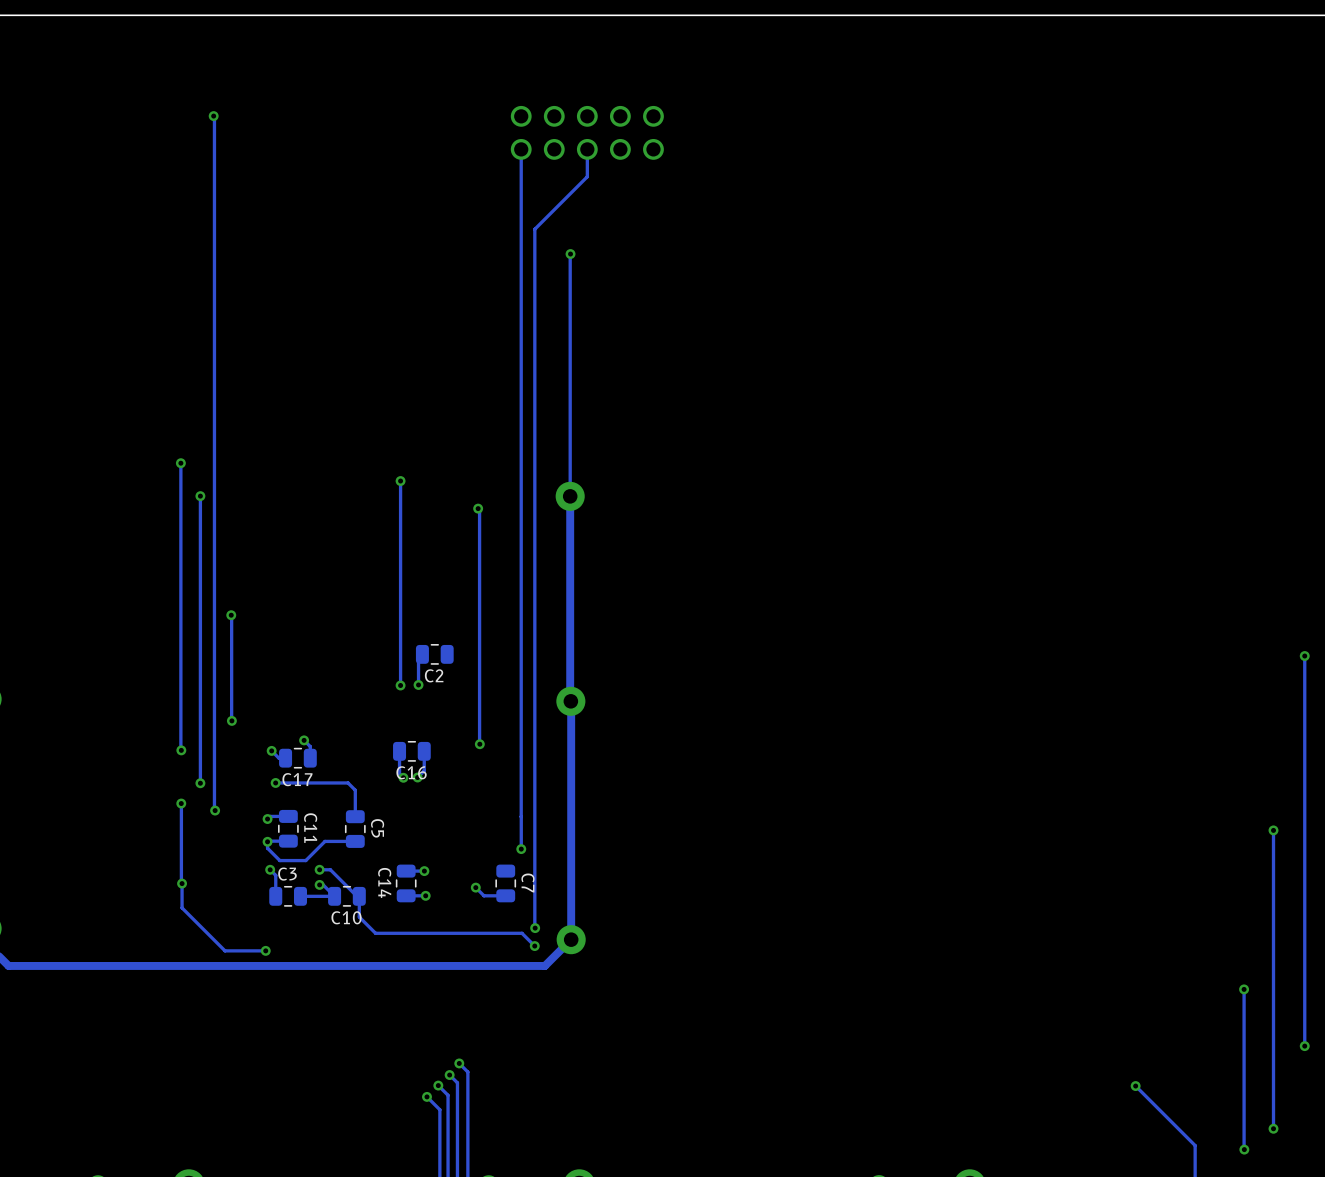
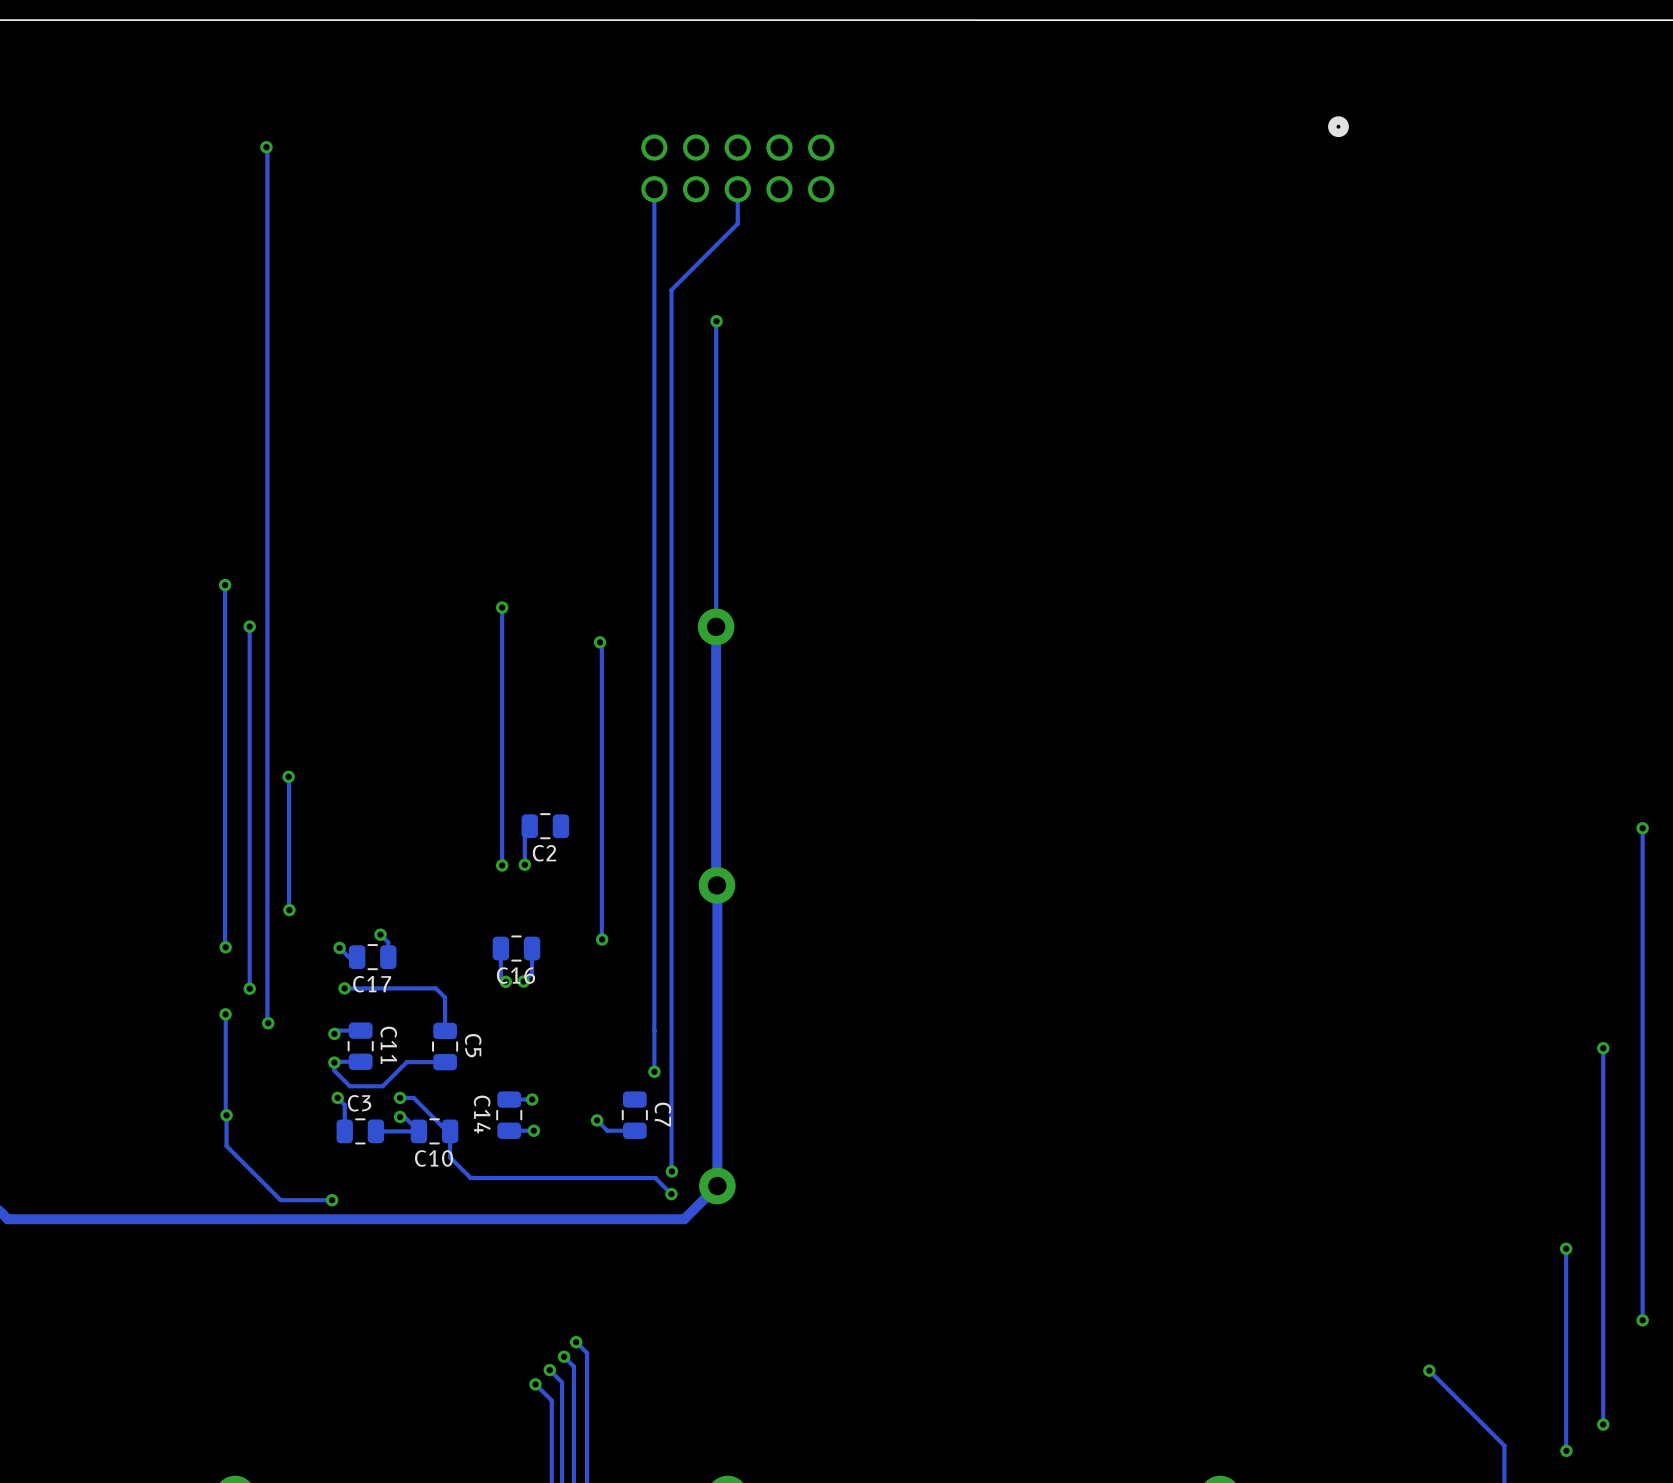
part: none -> (1338, 126)

